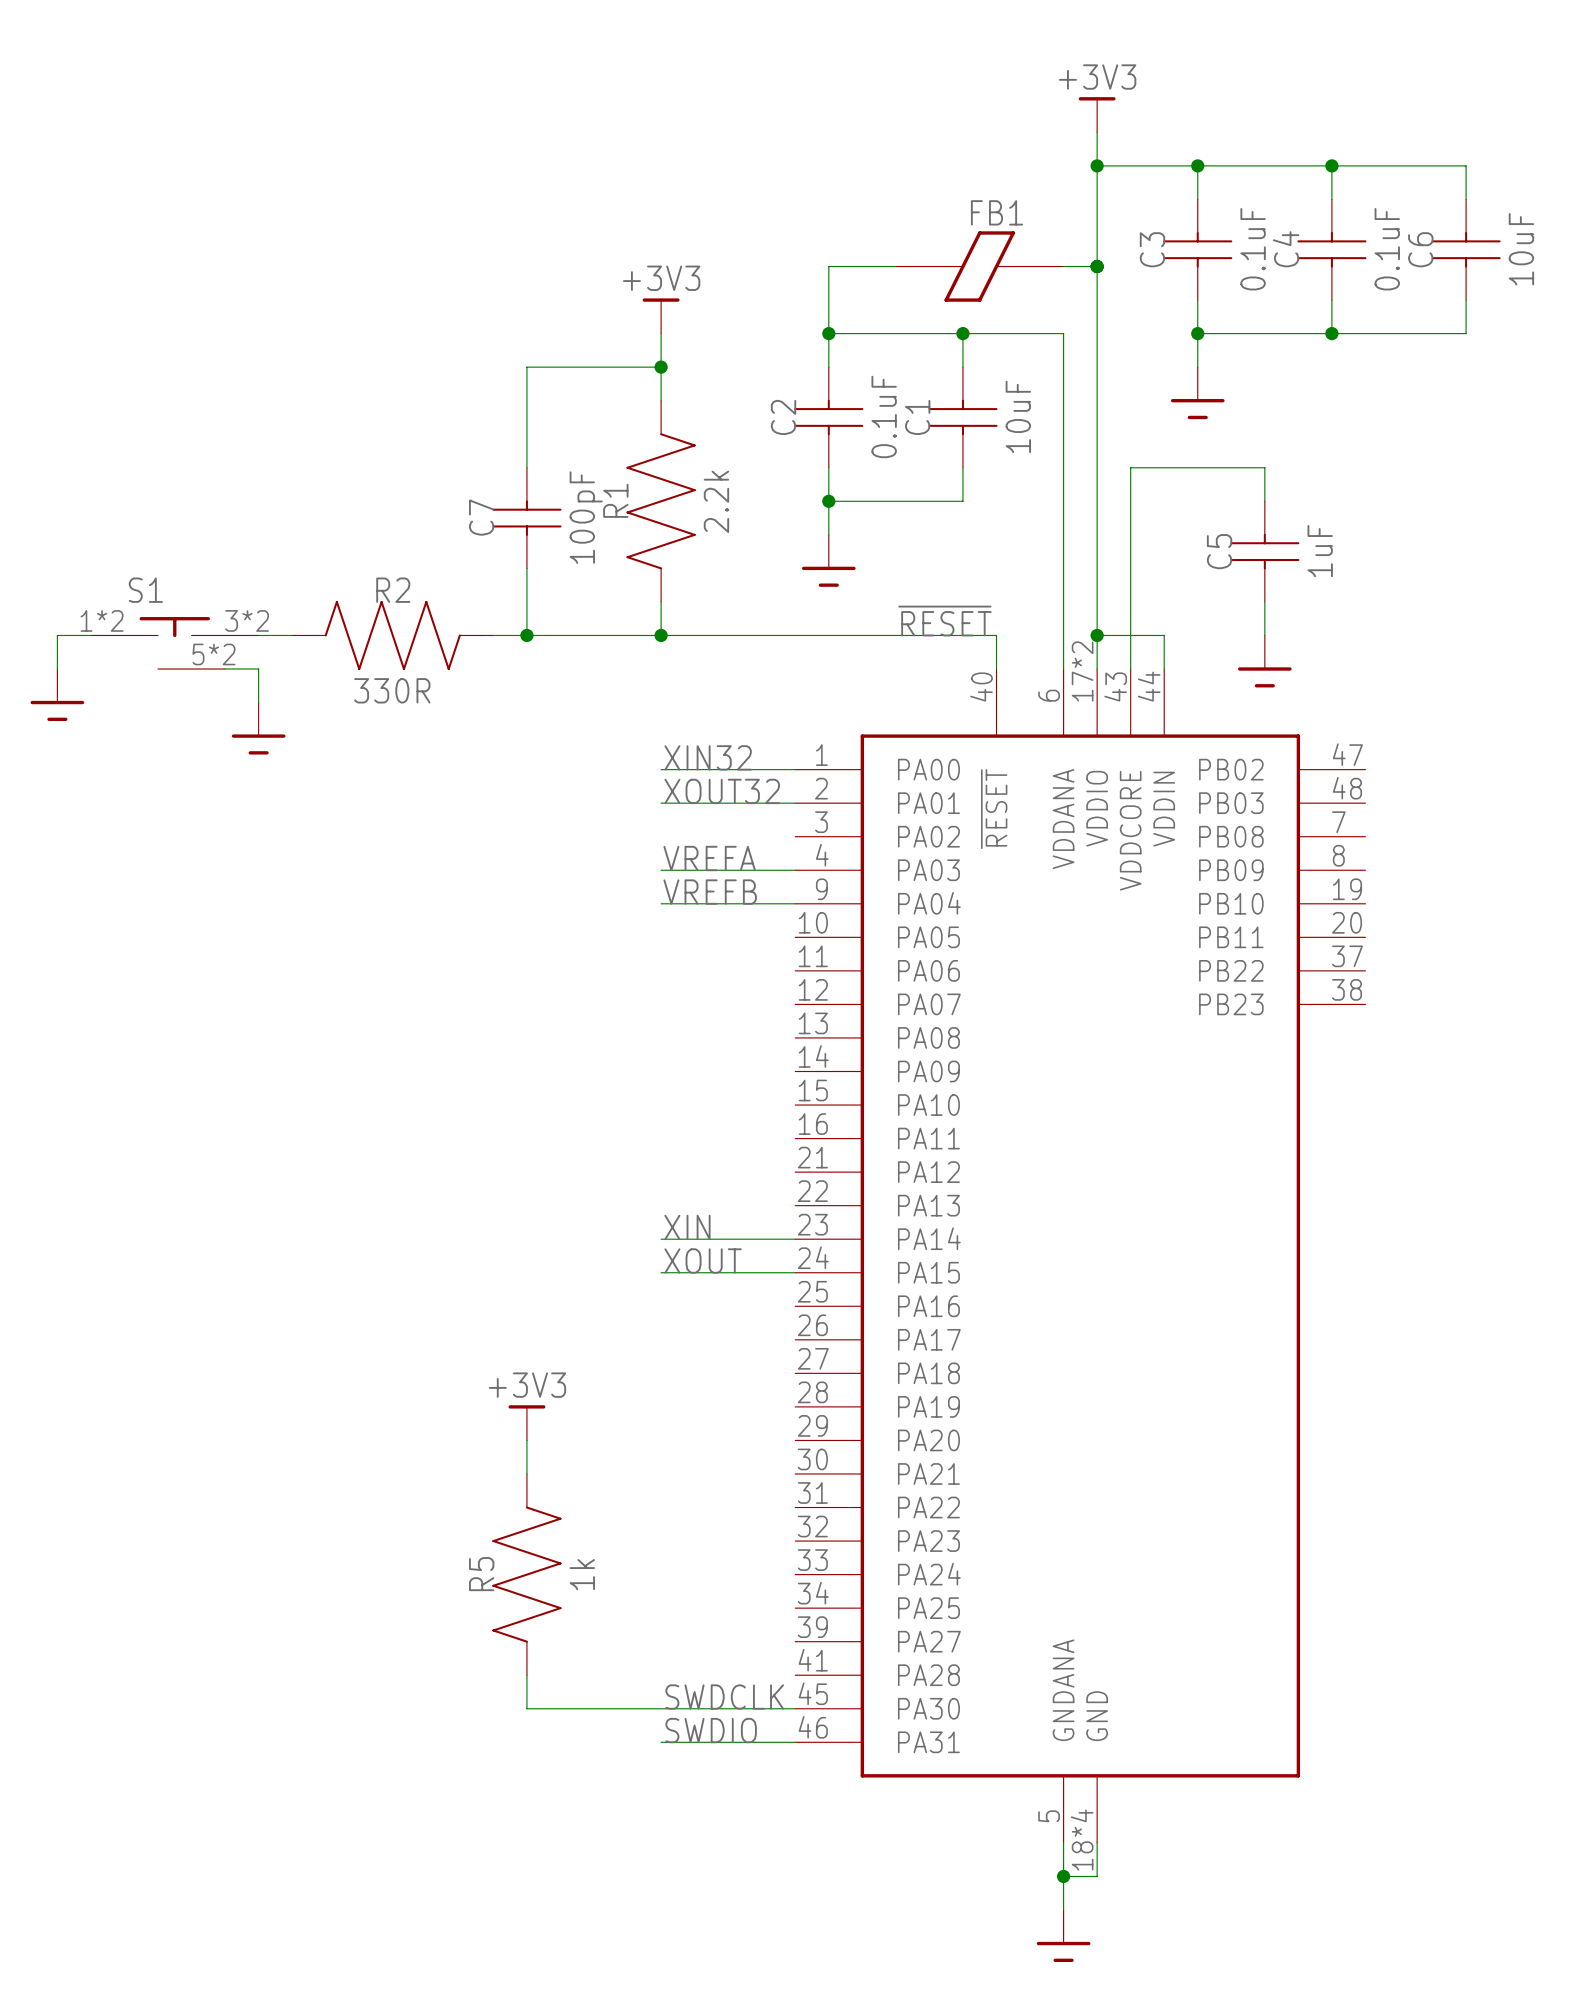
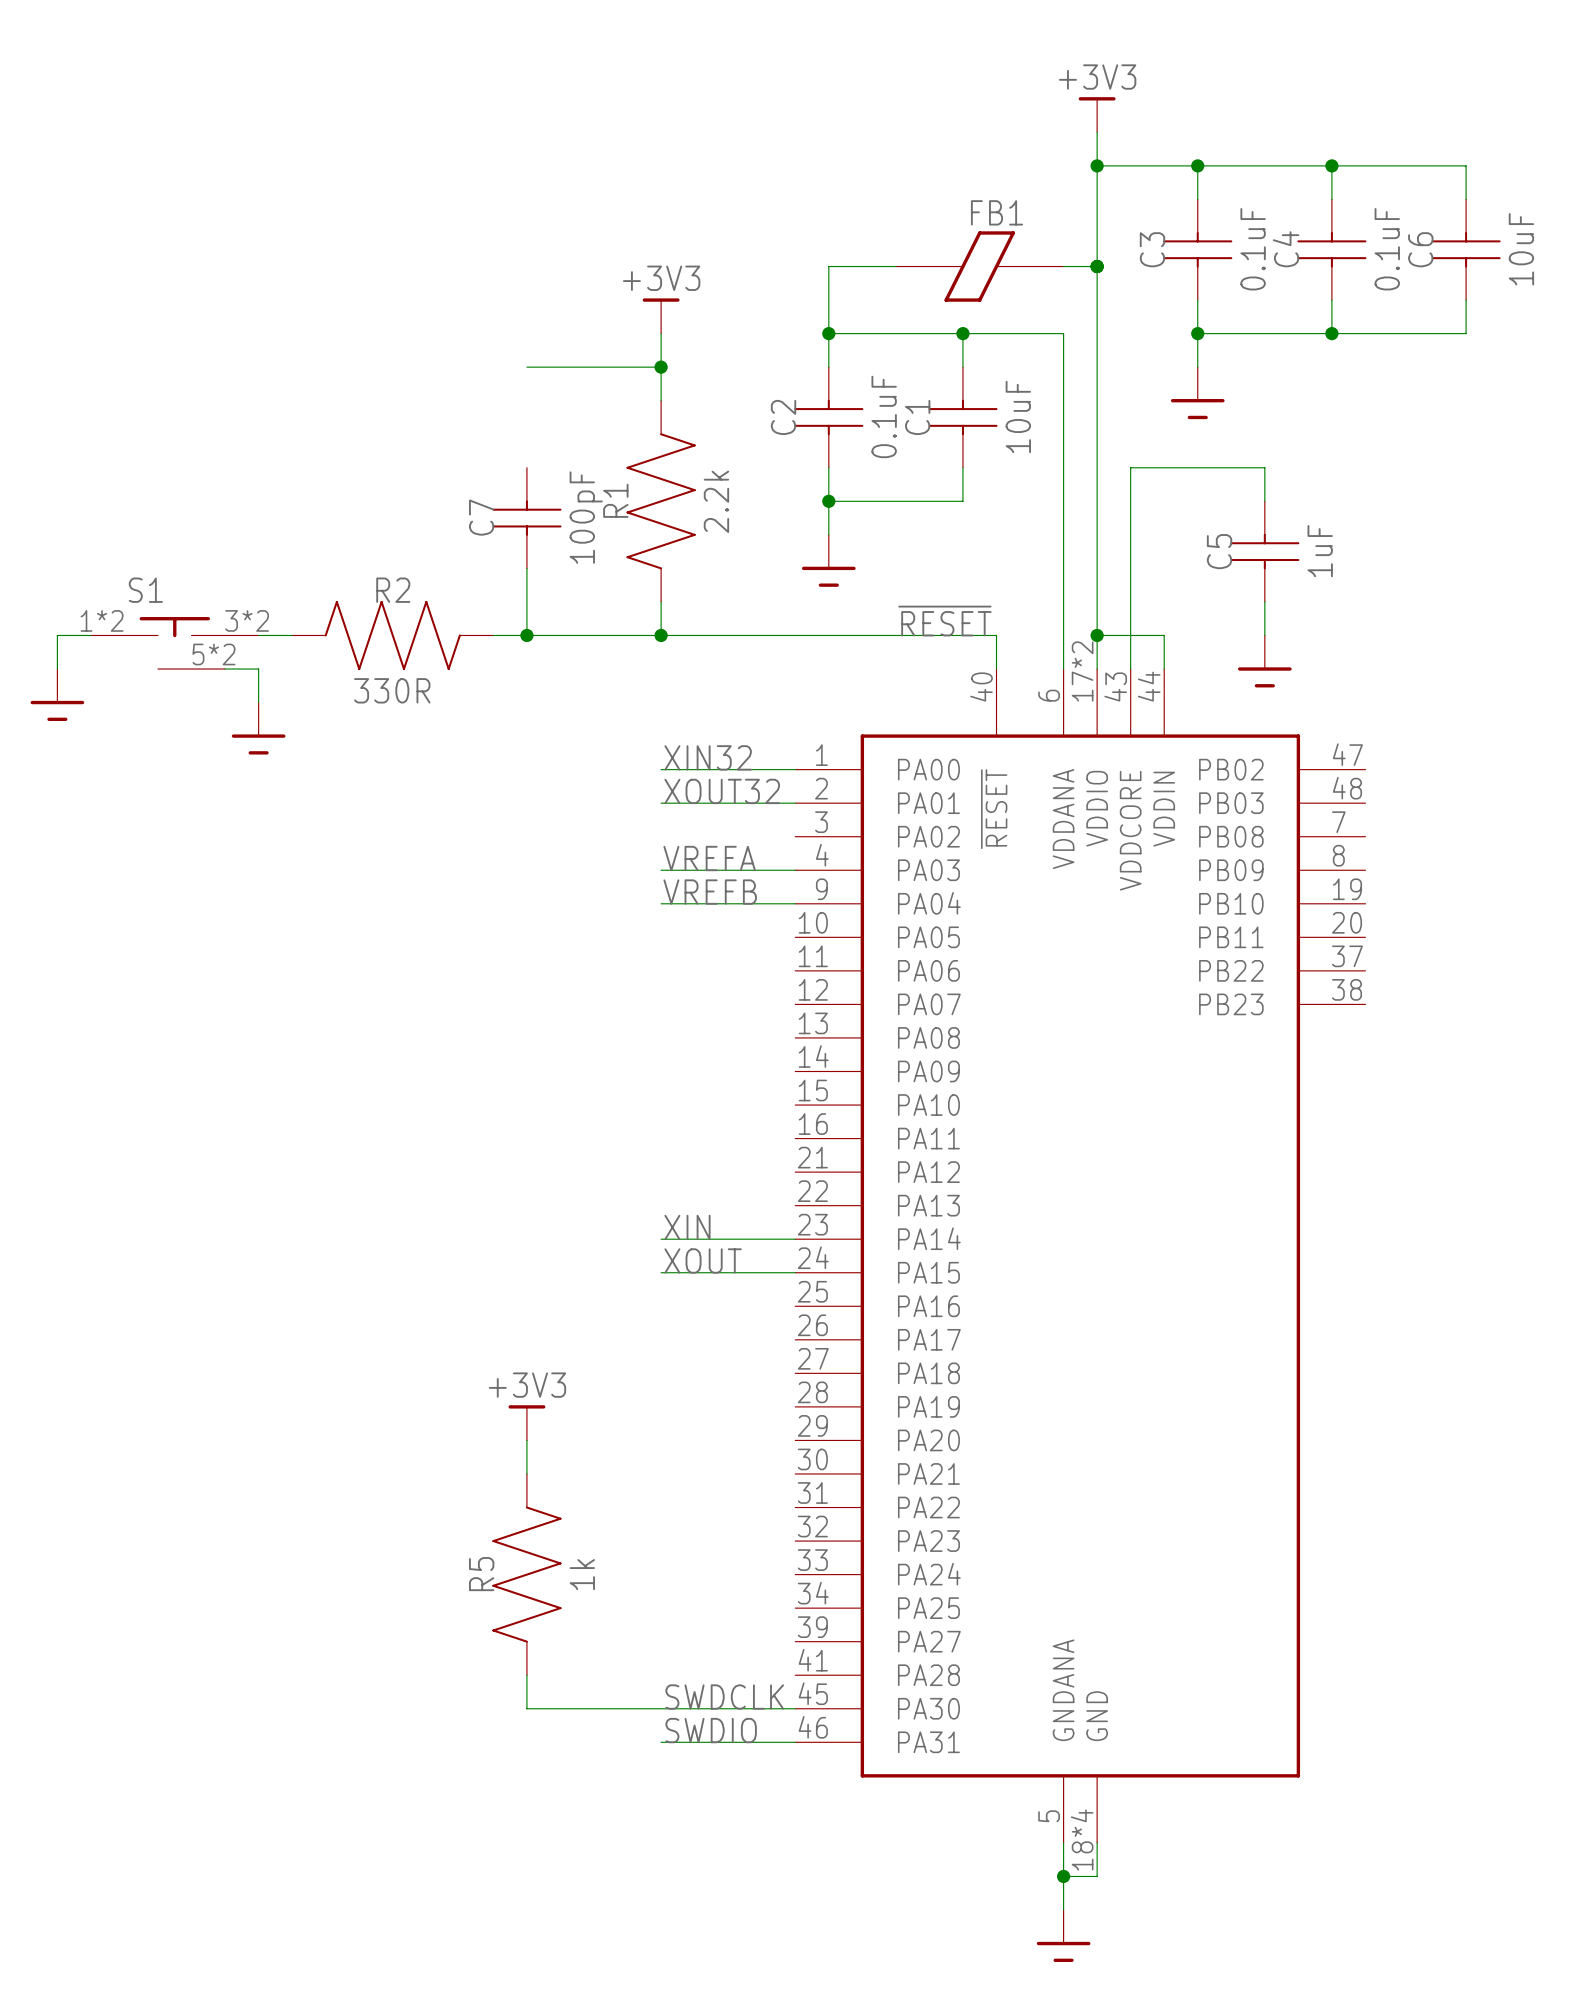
wire: (526, 367) (526, 467) -> none

